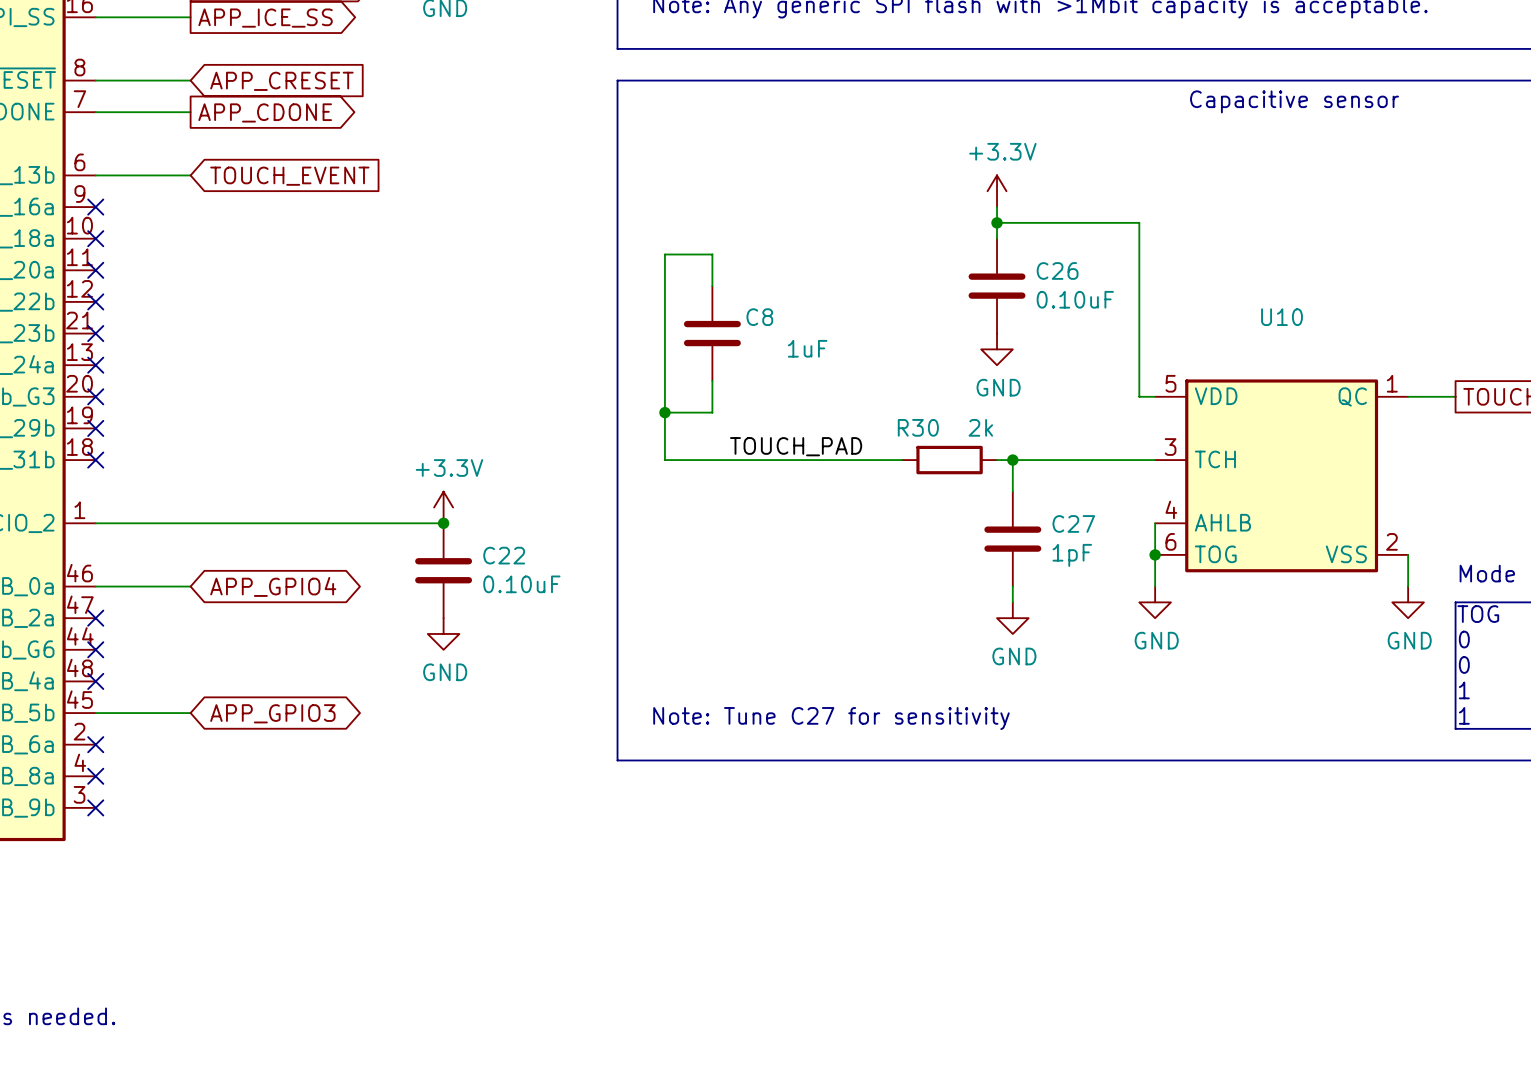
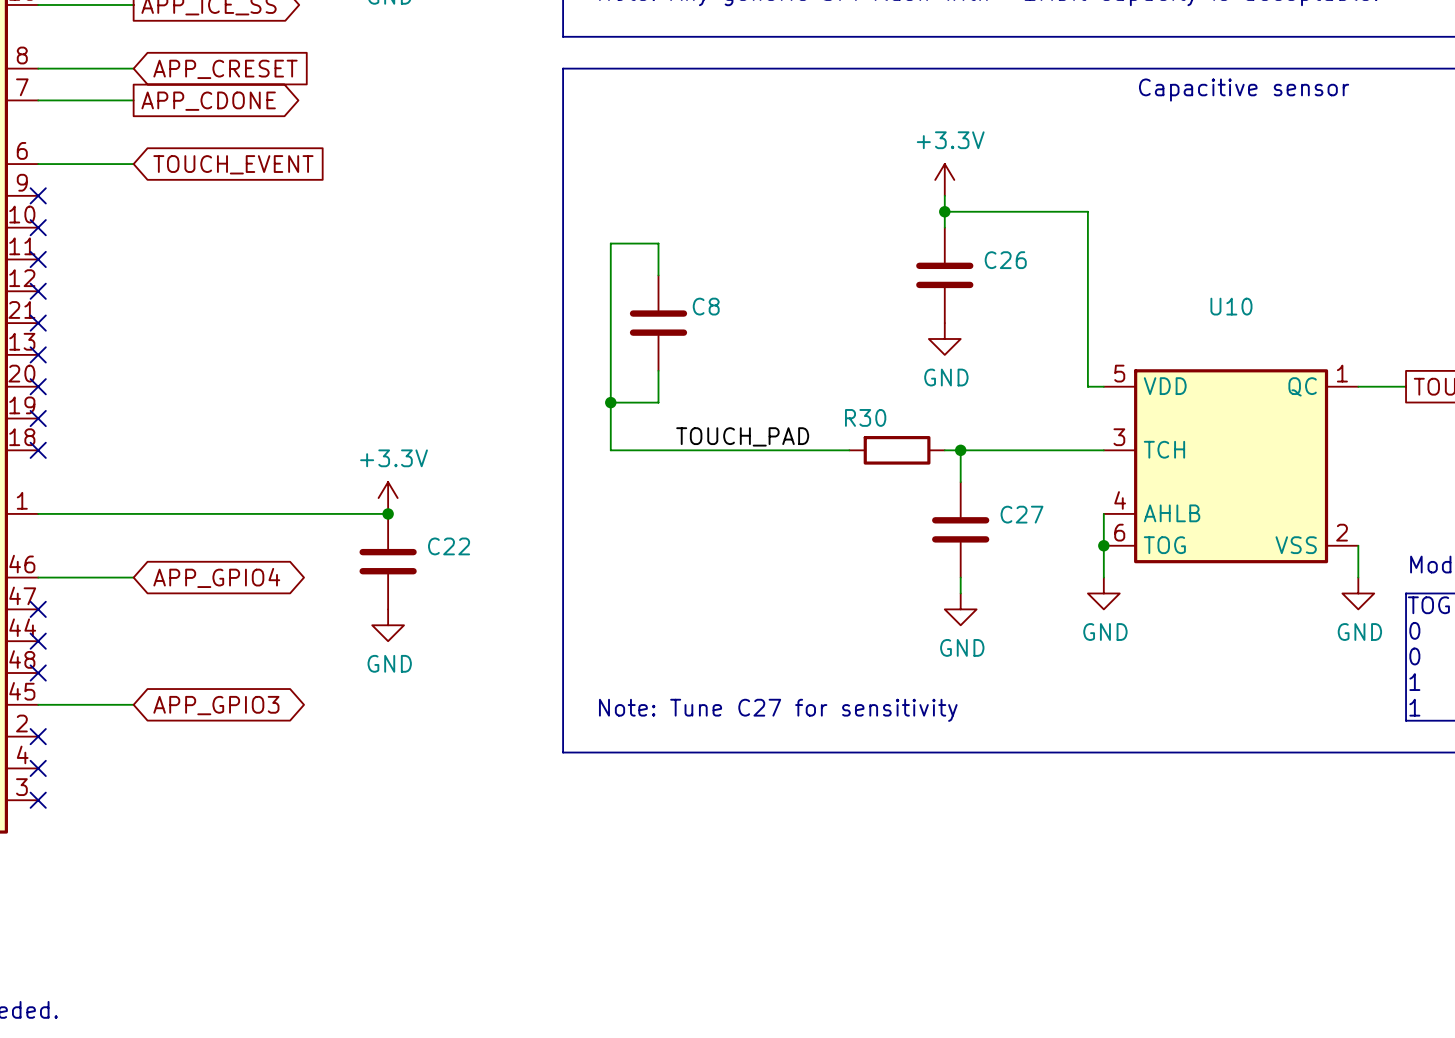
C26 value: 0.10uF (1075, 299) -> none
C8 value: 1uF (807, 348) -> none
R30 value: 2k (980, 427) -> none
C27 value: 1pF (1072, 555) -> none
C22 value: 0.10uF (521, 584) -> none

